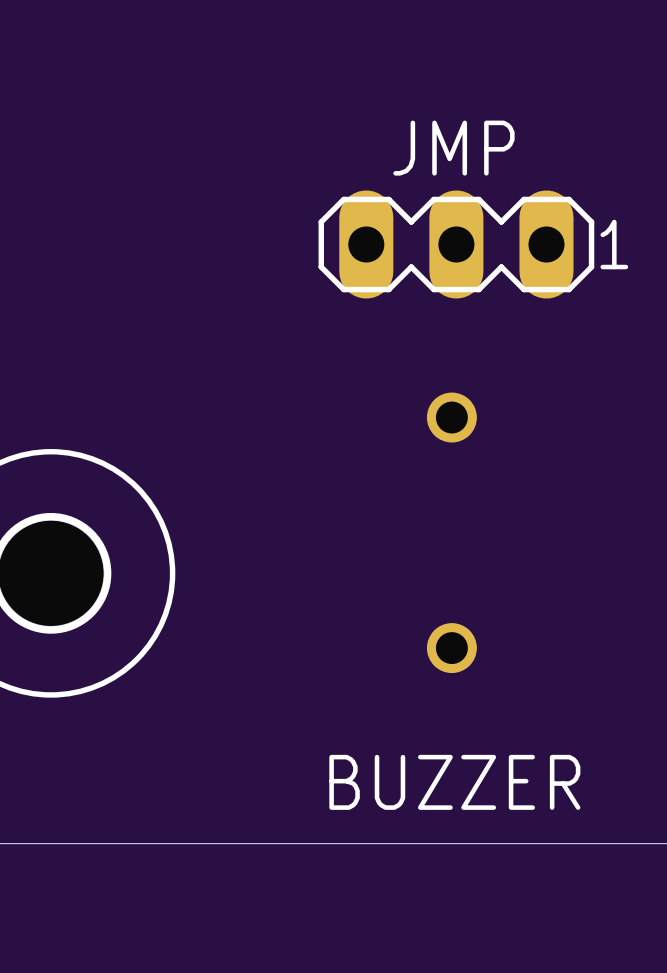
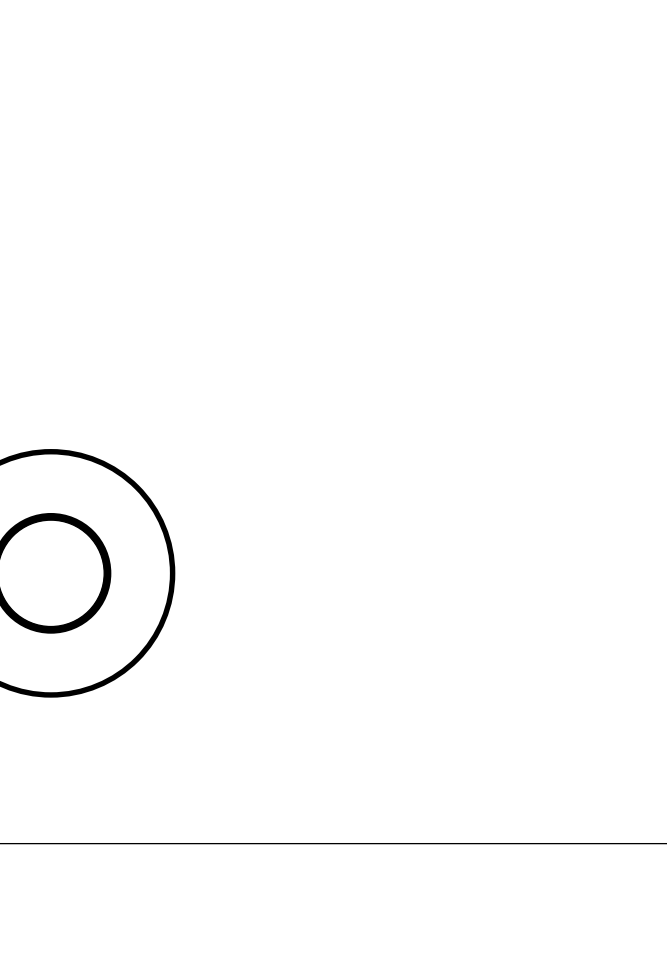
JMP: (456, 244) -> none
BUZZER: (451, 532) -> none

